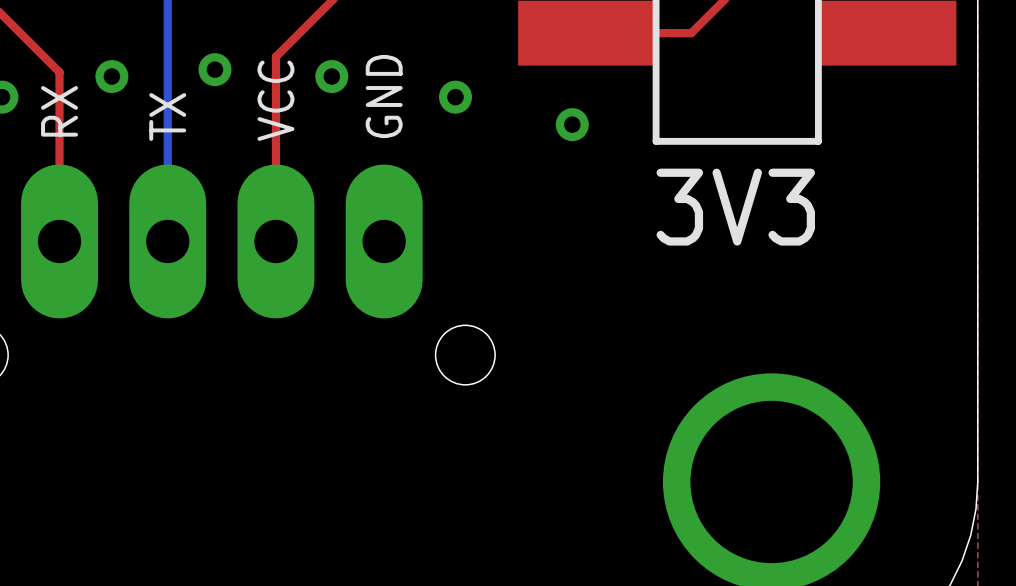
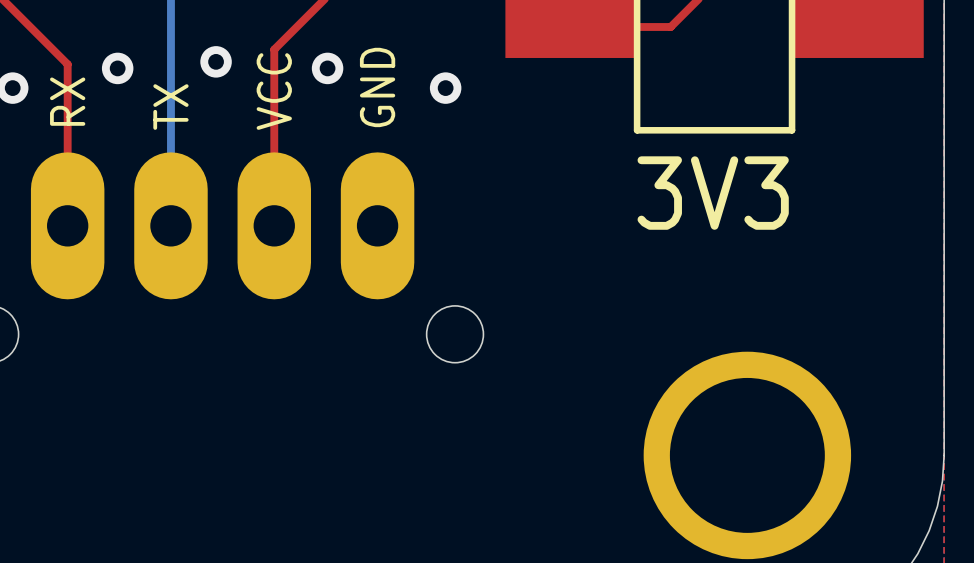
via: (572, 124) -> none

